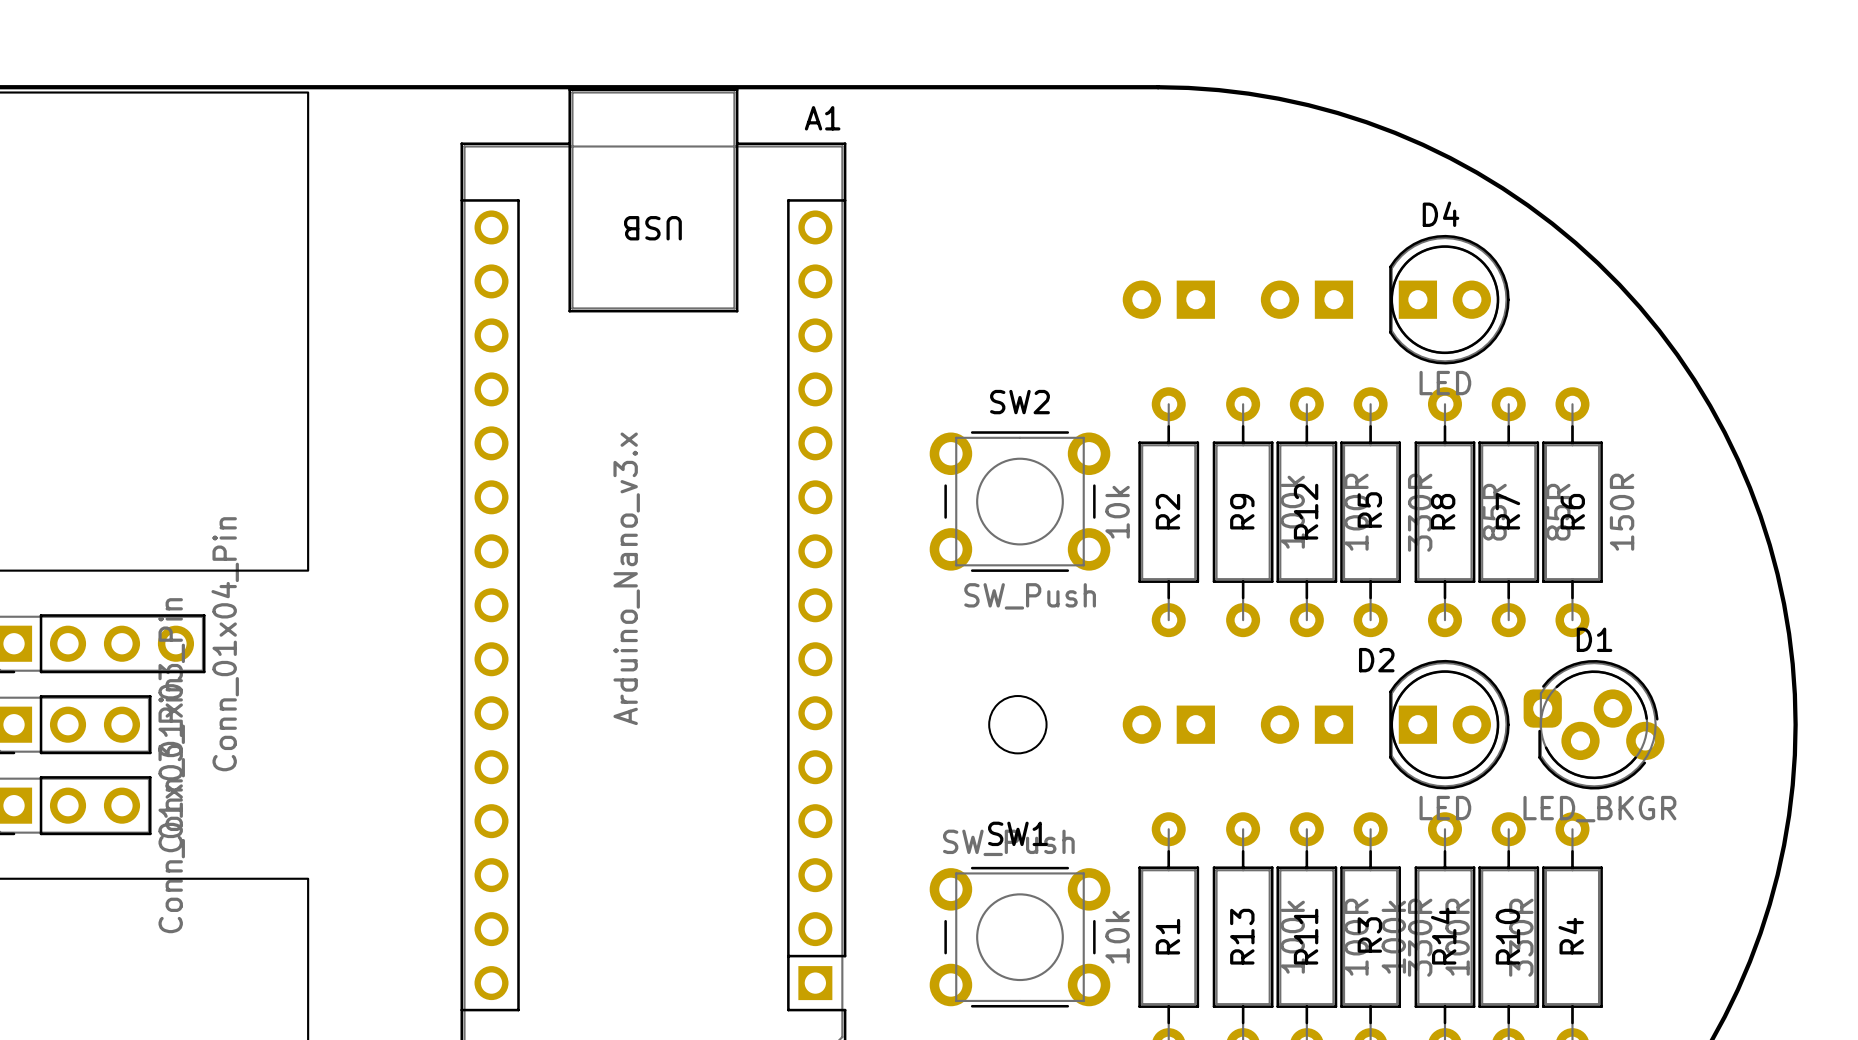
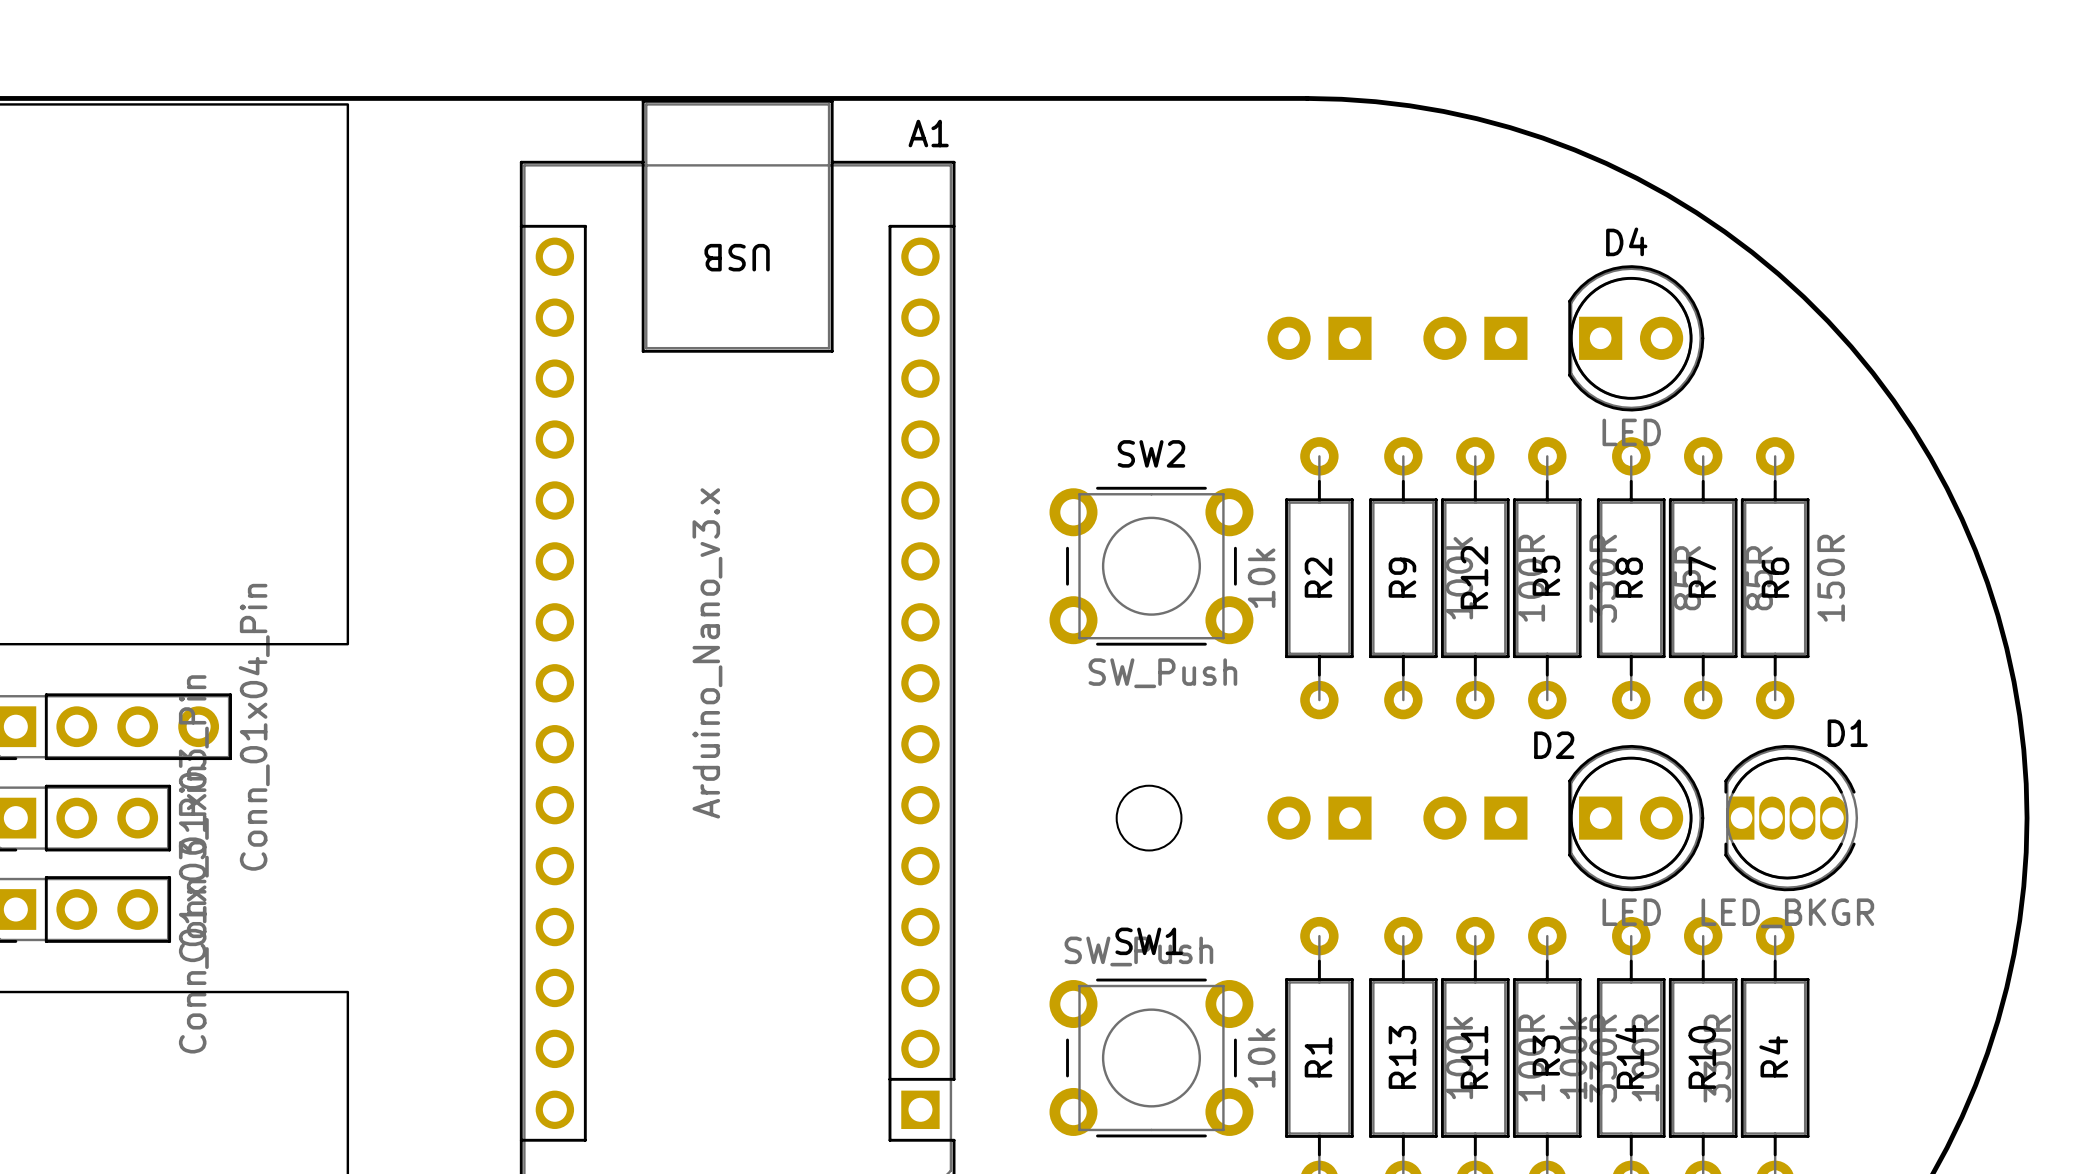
D1 name position: D1 (1594, 639) -> D1 (1847, 733)
D1 footprint: [1523, 660, 1665, 790] -> [1724, 744, 1859, 892]

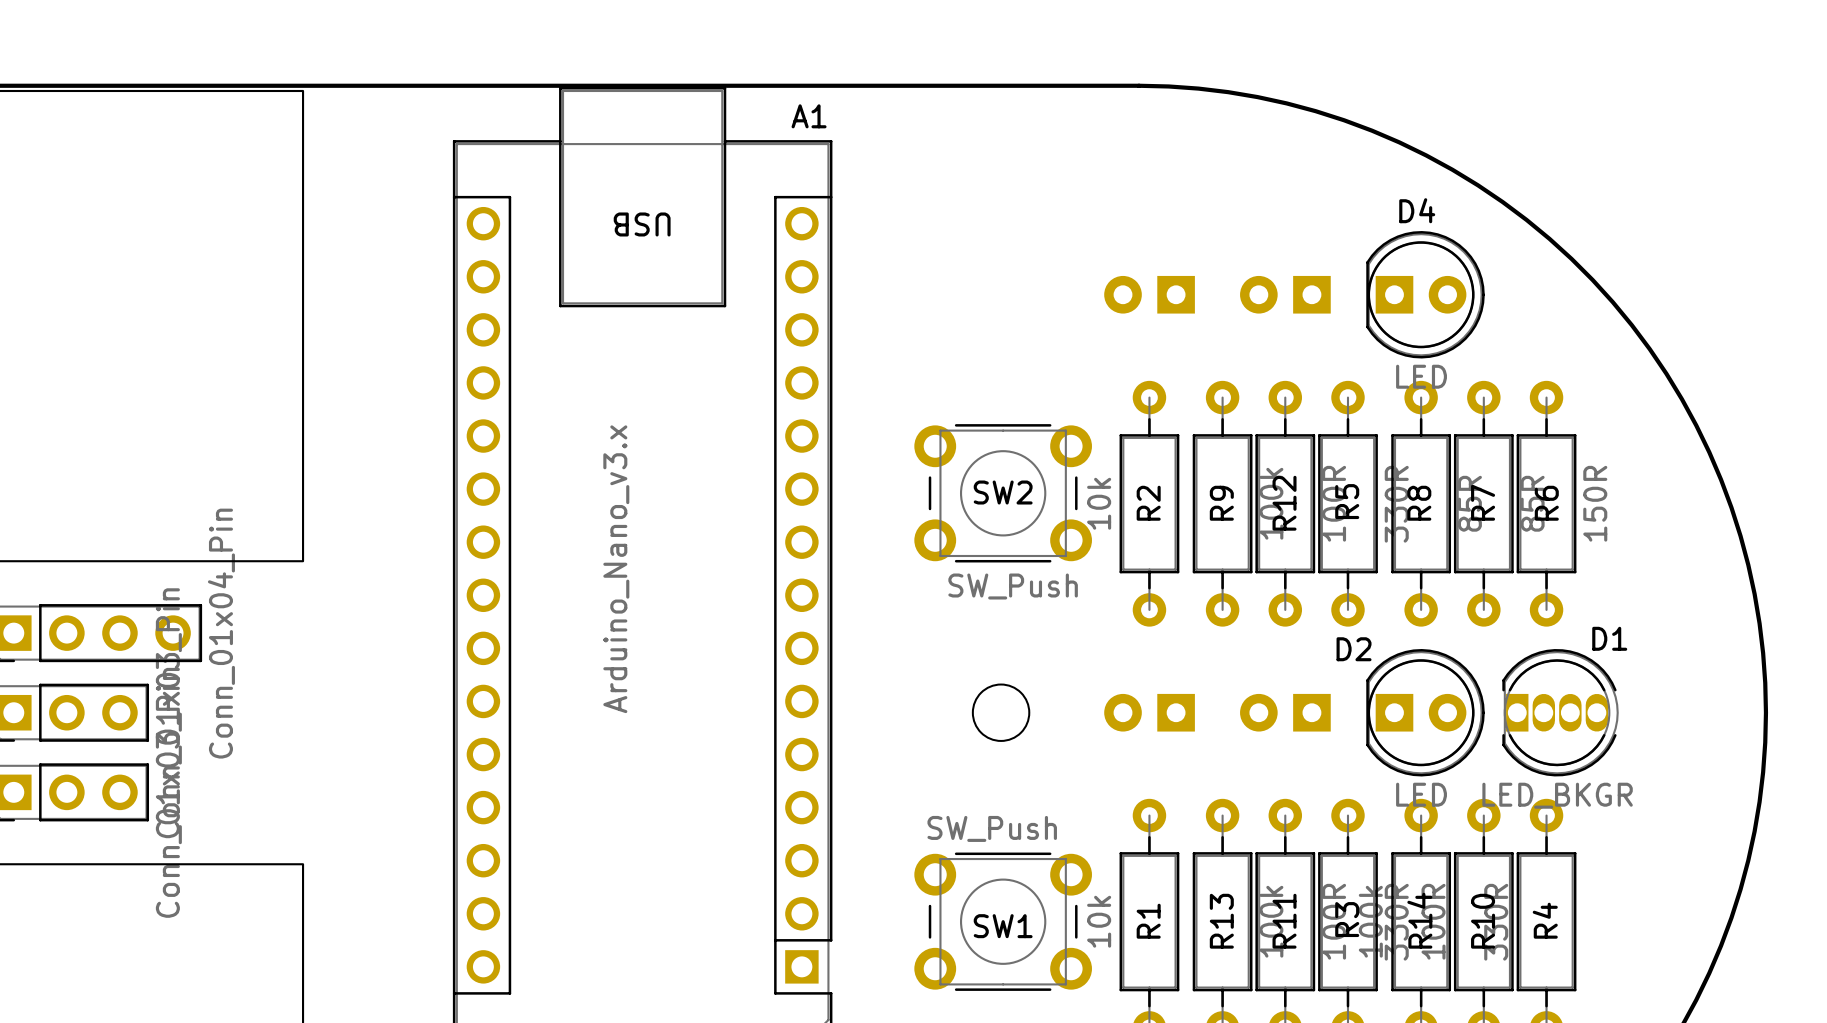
SW2 name position: SW2 (1151, 453) -> SW2 (1003, 492)
SW1 name position: SW1 (1149, 941) -> SW1 (1003, 926)

